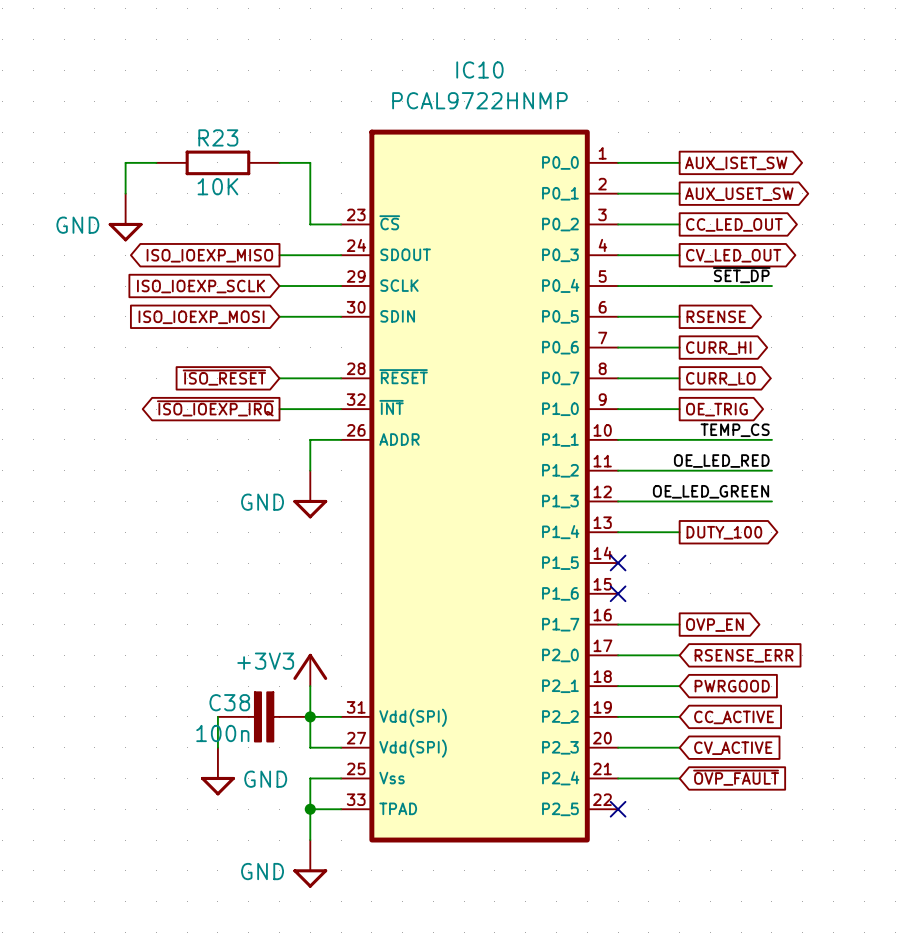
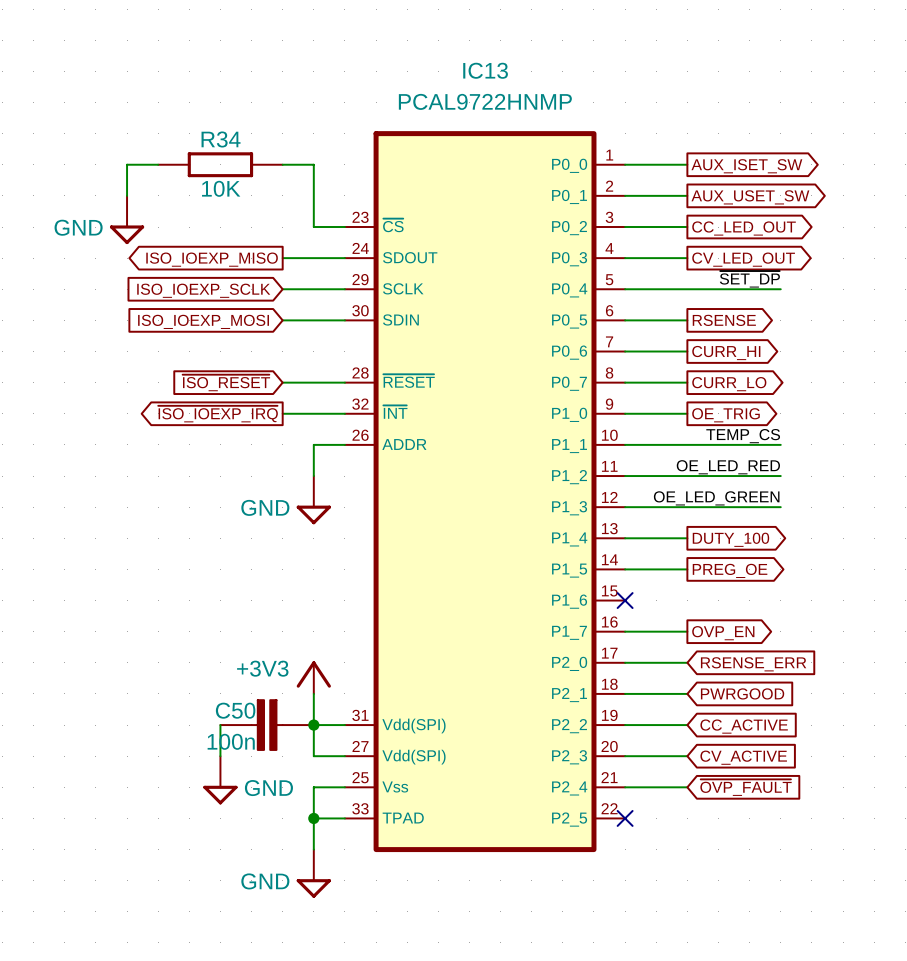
IC10 name: IC10 (479, 69) -> IC13 (485, 70)
R23 name: R23 (218, 137) -> R34 (221, 139)
wire: none -> (625, 569) (687, 569)
no-connect mark: (618, 563) -> none
global label: none -> PREG_OE (730, 570)
C38 name: C38 (229, 702) -> C50 (235, 710)

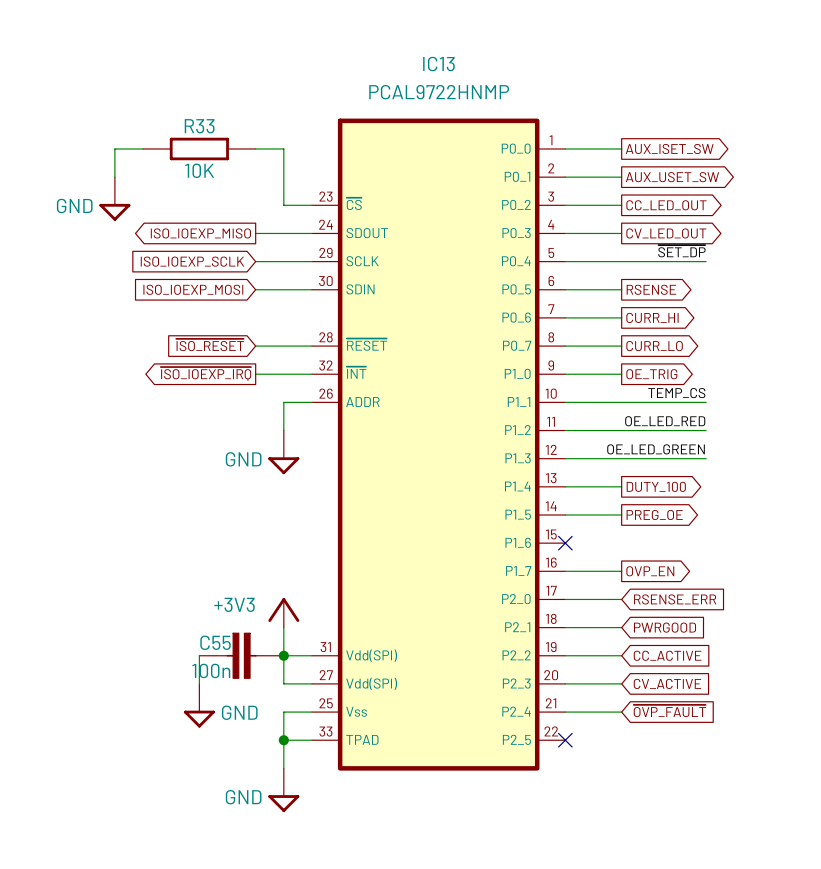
R34 name: R34 (221, 139) -> R33 (199, 126)
C50 name: C50 (235, 710) -> C55 (215, 642)

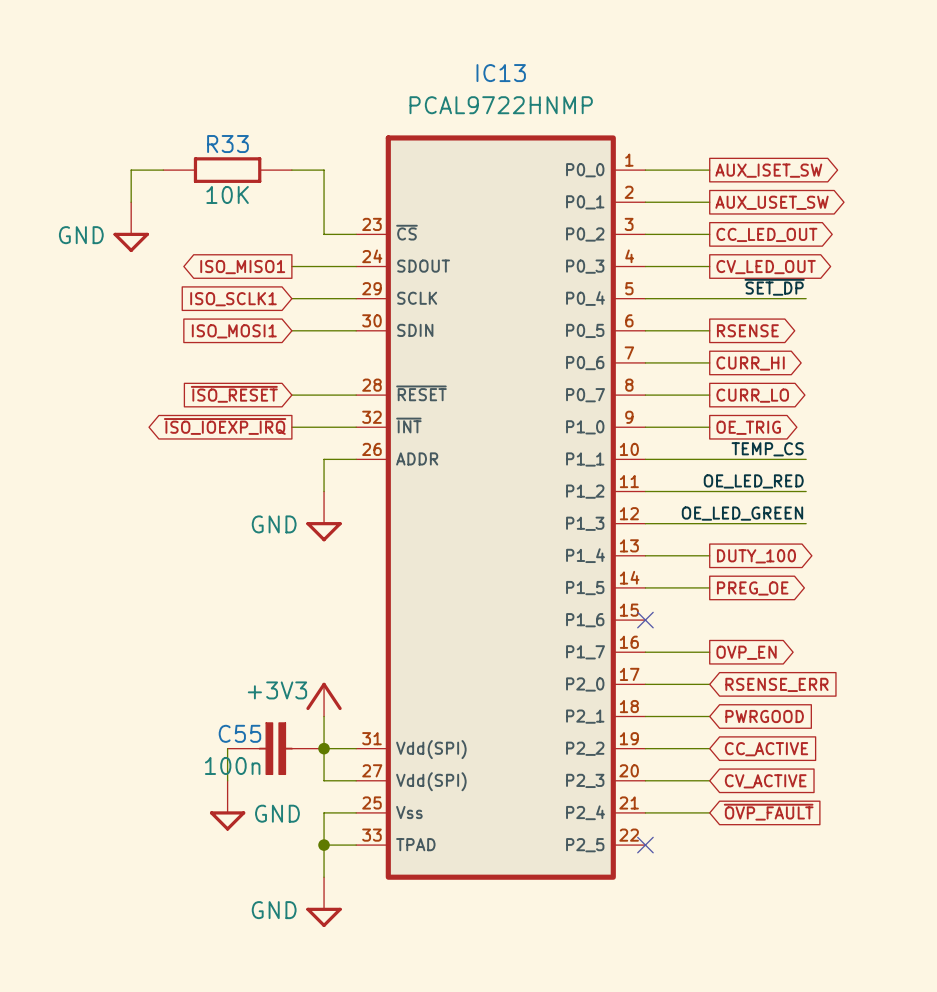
global label: ISO_IOEXP_MISO (200, 233) -> ISO_MISO1 (242, 267)
global label: ISO_IOEXP_SCLK (192, 261) -> ISO_SCLK1 (233, 299)
global label: ISO_IOEXP_MOSI (193, 289) -> ISO_MOSI1 (234, 331)

